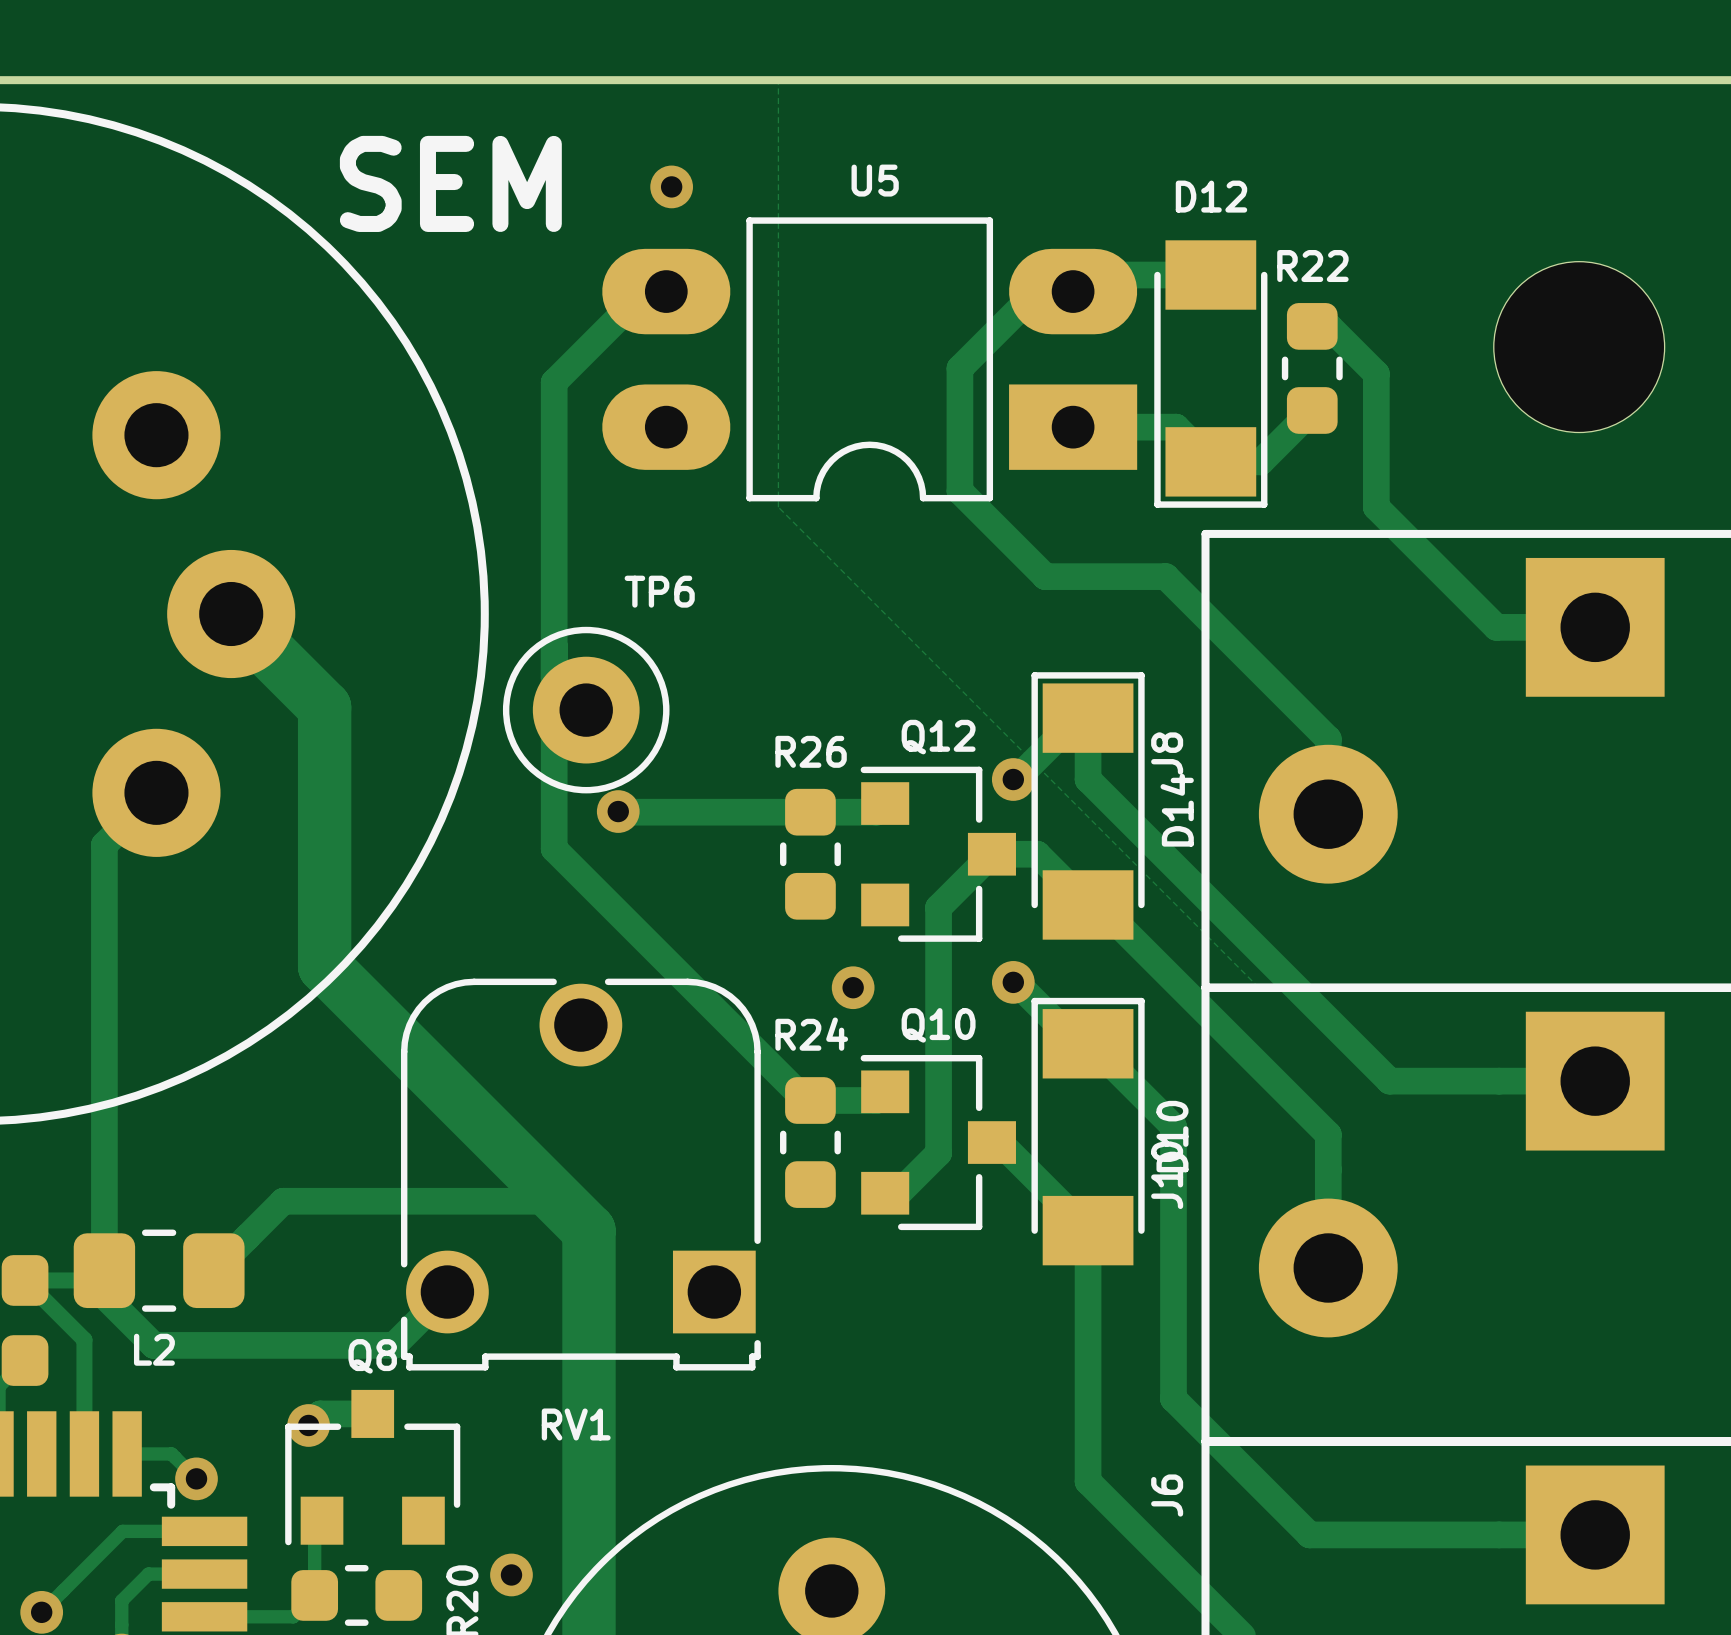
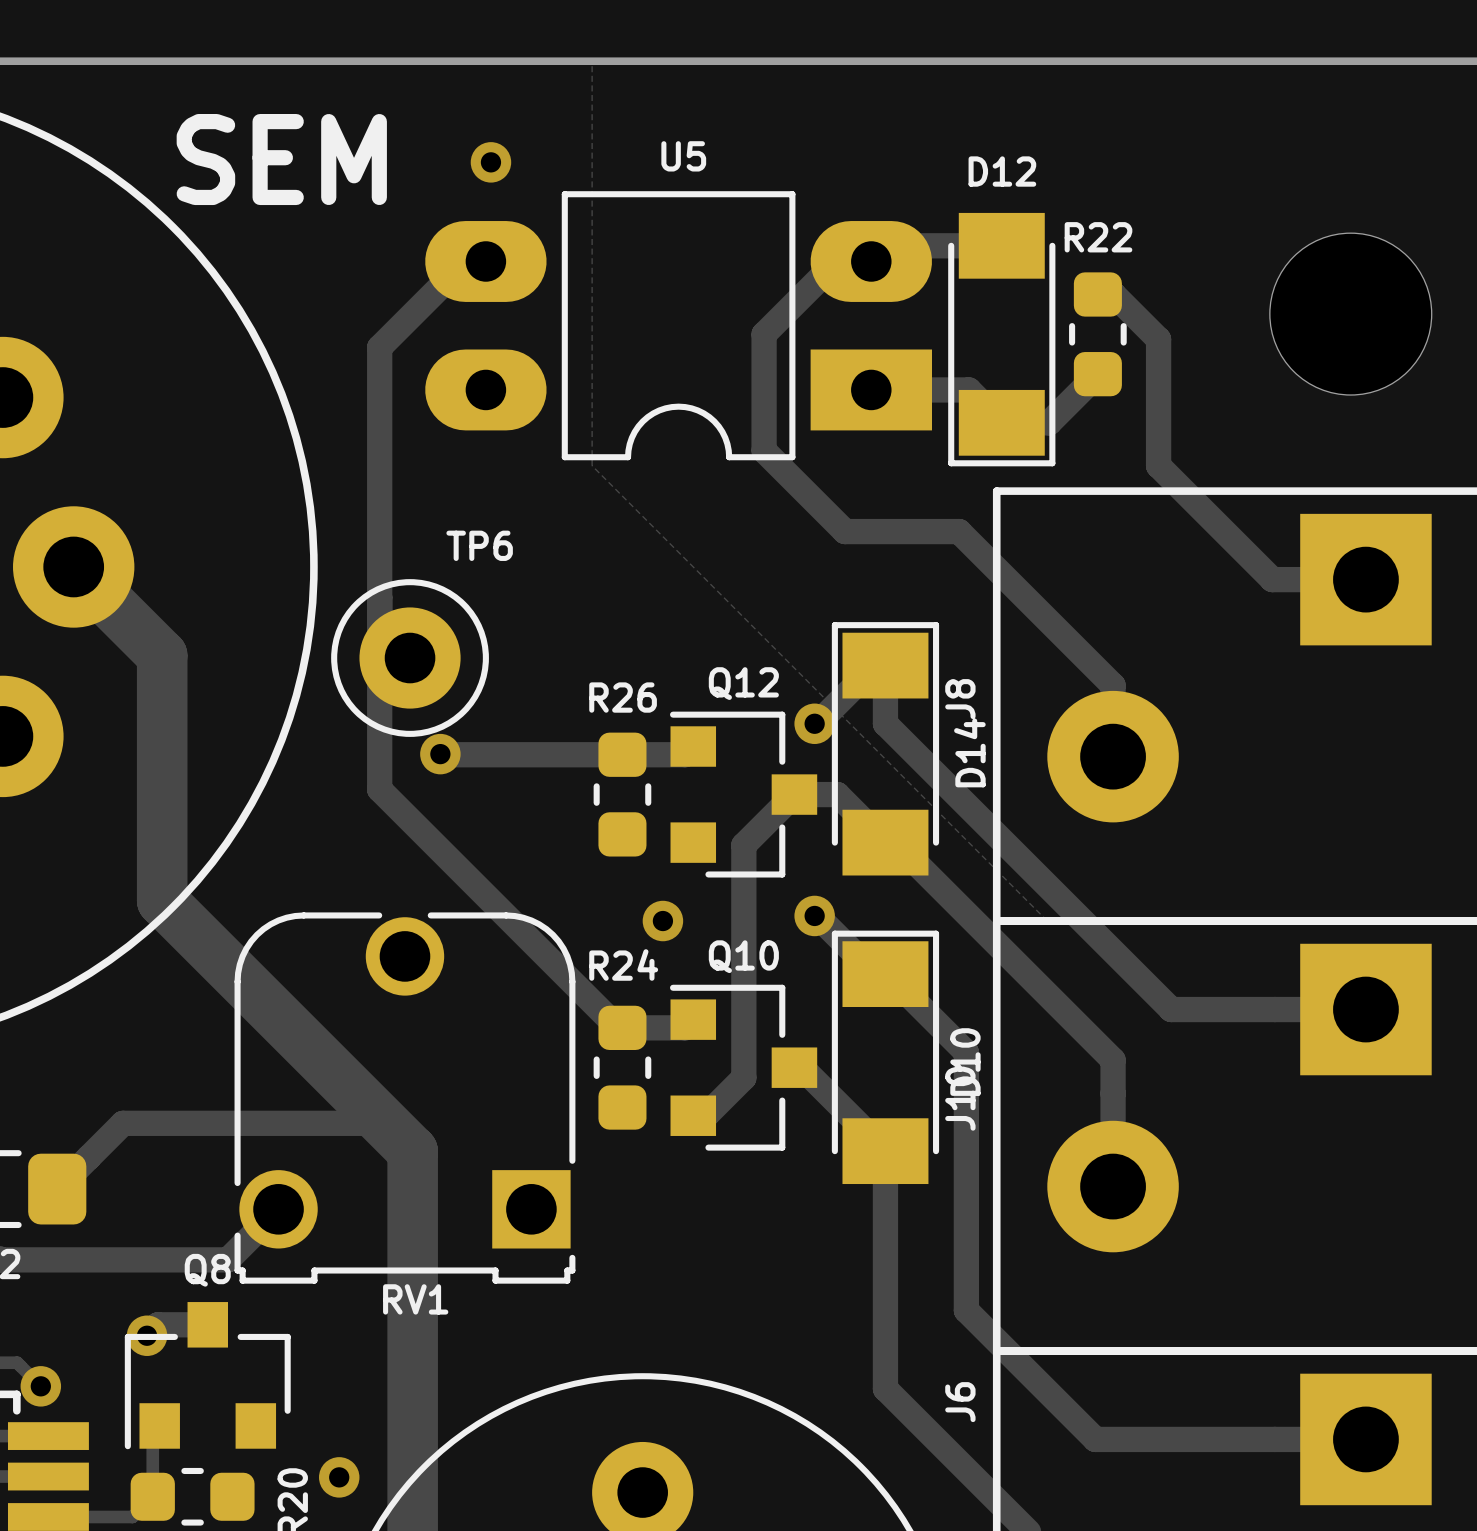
RV1 name position: RV1 (576, 1424) -> RV1 (415, 1299)

